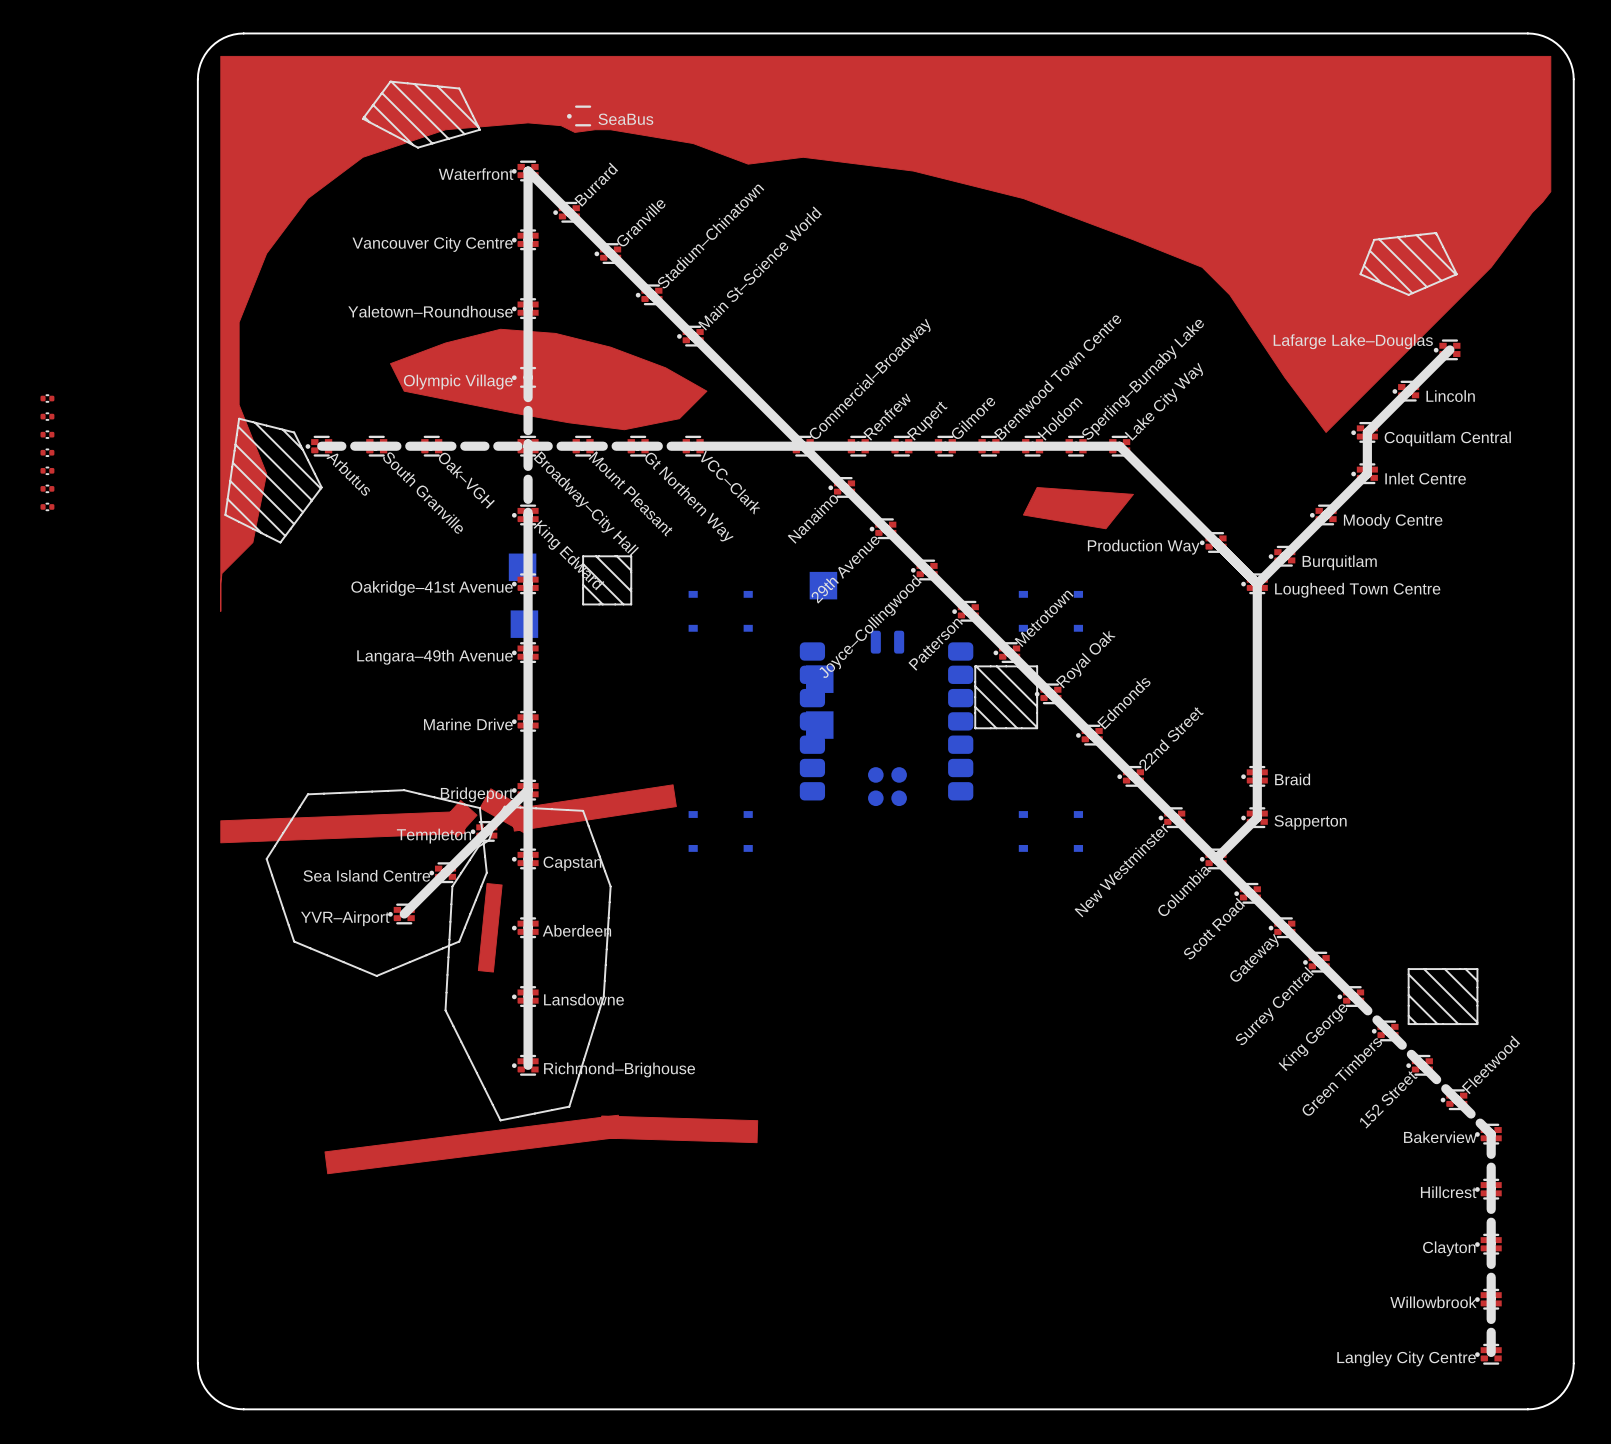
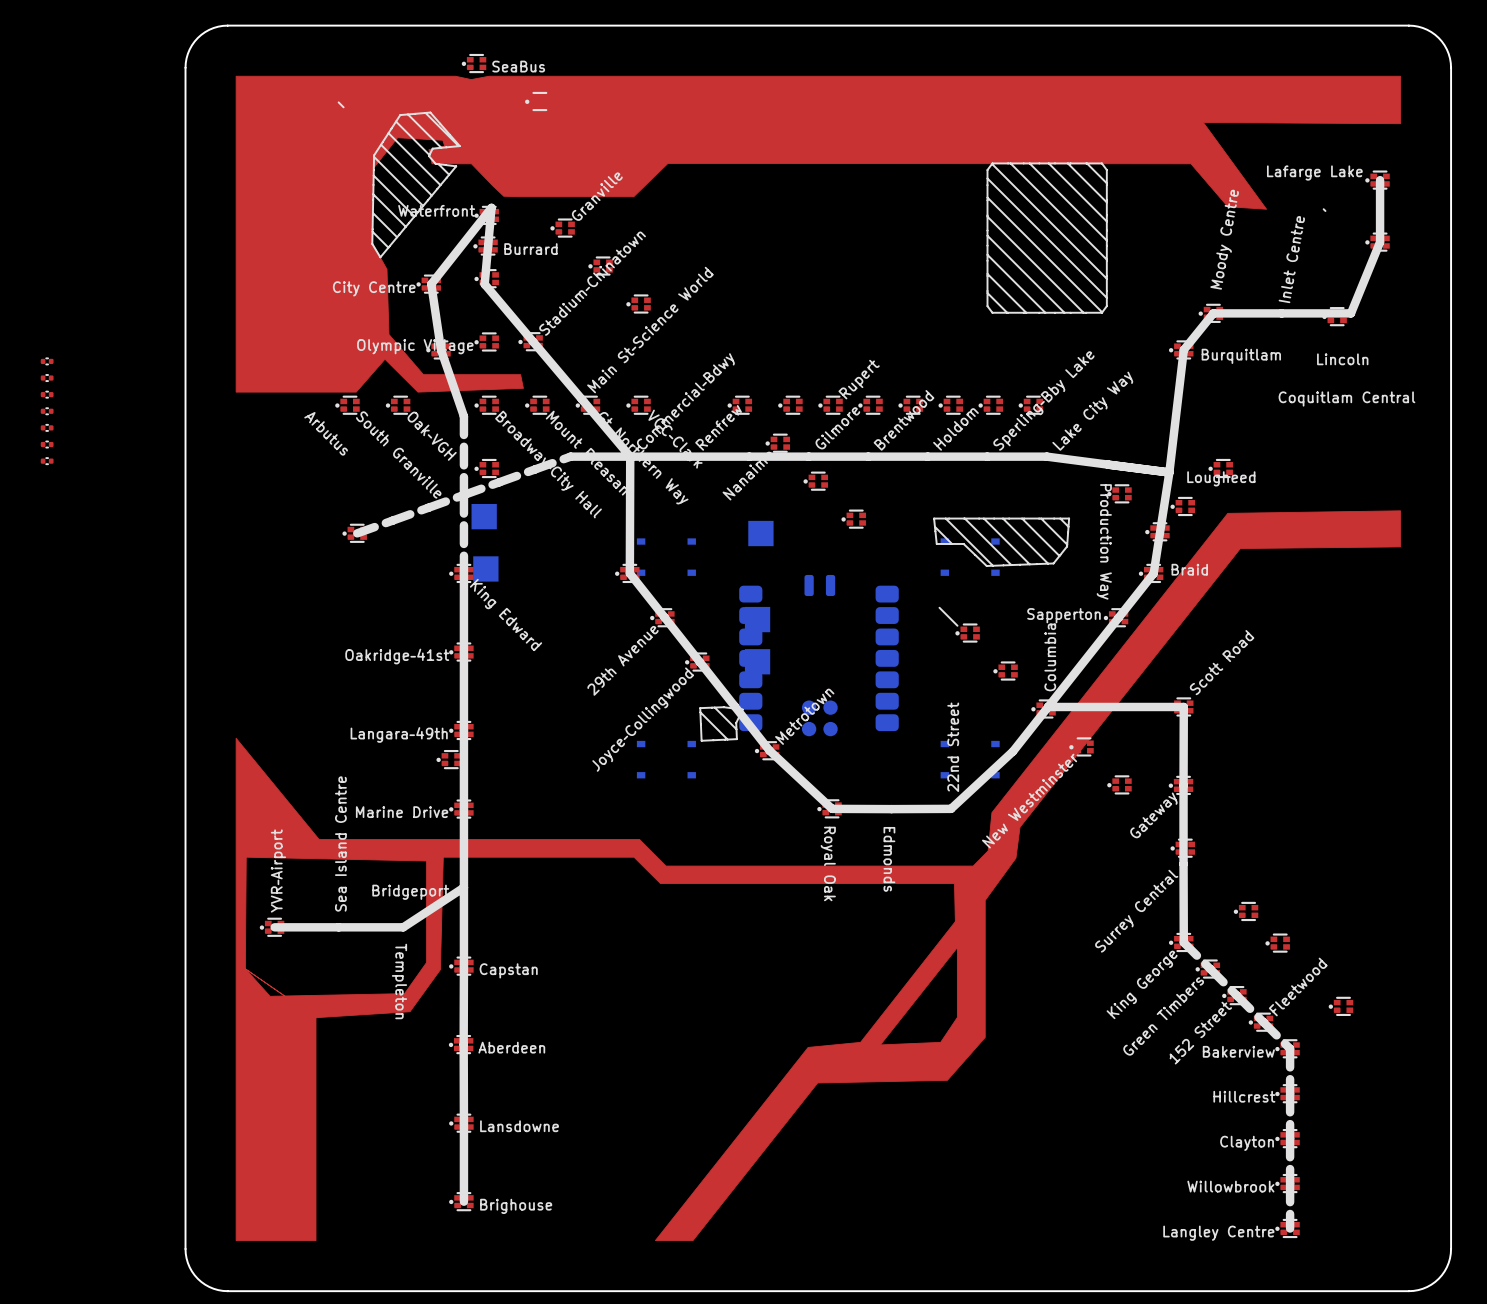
drawing: [220, 55, 1552, 612] -> none
part: none -> (474, 63)
line: (390, 81) (459, 88) (479, 129) (418, 147) (362, 118) (390, 81) -> none
line: (391, 81) (448, 138) -> none
line: (414, 84) (464, 134) -> none
line: (437, 86) (478, 127) -> none
drawing: none -> [235, 75, 1401, 393]
line: (382, 93) (426, 137) -> none
line: (373, 104) (413, 145) -> none
text position: SeaBus (625, 119) -> SeaBus (518, 66)
line: none -> (430, 112) (459, 146) (432, 148) (429, 156) (435, 163) (456, 166) (380, 257) (372, 243) (374, 155) (400, 115) (430, 112)
line: none -> (425, 112) (458, 146)
line: none -> (407, 114) (441, 147)
line: none -> (401, 126) (429, 155)
line: none -> (388, 133) (440, 185)
line: none -> (381, 144) (431, 195)
part: (525, 171) -> none
text position: Waterfront (476, 174) -> Waterfront (436, 210)
line: none -> (374, 156) (423, 206)
line: none -> (992, 163) (1106, 278)
line: none -> (992, 163) (1101, 163) (1106, 170) (1106, 306) (1101, 312) (992, 312) (987, 306) (987, 170) (992, 163)
line: none -> (1010, 163) (1106, 259)
line: none -> (1029, 163) (1106, 240)
line: none -> (1048, 163) (1106, 221)
line: none -> (1086, 163) (1106, 183)
line: none -> (438, 164) (449, 174)
text rotation: 0° (596, 184) -> 45° clockwise (530, 249)
text position: Burrard (596, 184) -> Burrard (530, 249)
text: none -> Lafarge Lake (1314, 173)
line: none -> (373, 175) (414, 216)
line: none -> (987, 178) (1106, 297)
part: none -> (1377, 180)
line: none -> (1380, 180) (1380, 242) (1350, 313) (1213, 313) (1183, 349) (1169, 472)
part: (566, 212) -> none
line: none -> (373, 194) (405, 226)
line: none -> (987, 197) (1102, 312)
line: (1436, 232) (1374, 239) (1360, 274) (1408, 294) (1456, 274) (1436, 232) -> none
line: (1416, 235) (1455, 274) -> none
text position: Stadium–Chinatown (711, 236) -> Stadium–Chinatown (592, 283)
line: none -> (372, 213) (397, 237)
line: (1397, 237) (1441, 280) -> none
line: (1379, 239) (1426, 287) -> none
line: none -> (987, 216) (1083, 312)
text: Vancouver City Centre (432, 244) -> none
line: (1369, 250) (1412, 293) -> (1067, 163) (1106, 202)
line: none -> (372, 231) (388, 247)
line: none -> (987, 235) (1064, 312)
line: (1363, 265) (1381, 283) -> none
text position: Main St–Science World (760, 268) -> Main St–Science World (650, 330)
part: none -> (1377, 242)
part: none -> (485, 246)
line: none -> (987, 254) (1045, 312)
line: none -> (987, 273) (1026, 312)
text: Yaletown–Roundhouse (430, 311) -> none
part: none -> (428, 284)
text: none -> City Centre (374, 288)
line: none -> (987, 293) (1007, 312)
text: Lafarge Lake–Douglas (1353, 341) -> none
part: none -> (1210, 313)
line: (1449, 349) (1367, 432) (1367, 473) (1257, 583) -> none
part: none -> (530, 341)
text: Brentwood Town Centre (1057, 377) -> none
text: Commercial–Broadway (870, 378) -> Commercial–Bdwy (685, 401)
text: Sperling–Burnaby Lake (1143, 379) -> Sperling–Bby Lake (1043, 400)
part: none -> (438, 349)
part: none -> (1181, 349)
part: (1405, 391) -> none
line: (528, 397) (528, 171) (1367, 1010) -> none
text position: Lake City Way (1163, 401) -> Lake City Way (1092, 411)
line: (528, 410) (528, 430) -> (463, 525) (463, 543)
text position: Renfrew (886, 417) -> Renfrew (718, 427)
text position: Gilmore (973, 417) -> Gilmore (837, 428)
line: (239, 418) (294, 432) (321, 487) (280, 542) (225, 515) (239, 418) -> none
text position: Holdom (1060, 419) -> Holdom (955, 429)
line: (254, 422) (320, 488) -> none
line: (238, 426) (311, 500) -> none
line: (282, 429) (302, 449) -> none
part: (1364, 432) -> none
line: (528, 443) (528, 466) -> none
line: (235, 444) (303, 512) -> none
part: (318, 446) -> none
line: (321, 446) (341, 446) -> none
line: (354, 446) (374, 446) -> none
line: (376, 446) (396, 446) -> none
line: (409, 446) (429, 446) -> none
line: (431, 446) (451, 446) -> none
line: (464, 446) (484, 446) -> none
line: (497, 446) (517, 446) -> none
line: (528, 446) (548, 446) -> none
line: (561, 446) (581, 446) -> none
line: (583, 446) (603, 446) -> none
line: (616, 446) (636, 446) -> none
line: (638, 446) (658, 446) -> none
line: (671, 446) (691, 446) -> none
line: (693, 446) (1119, 446) (1257, 583) -> none
line: (232, 462) (294, 524) -> none
text: none -> Brentwood (904, 420)
part: (1364, 473) -> none
line: none -> (463, 434) (463, 416) (441, 349) (431, 284) (491, 207) (484, 284) (630, 456) (629, 573) (769, 750) (832, 808) (951, 808) (1013, 751) (1048, 706)
text rotation: 0° (1425, 478) -> 80° counterclockwise (1291, 259)
text position: Inlet Centre (1425, 478) -> Inlet Centre (1291, 259)
line: (528, 479) (528, 499) -> (463, 446) (463, 465)
line: (230, 480) (285, 536) -> none
line: (227, 499) (261, 533) -> none
line: none -> (563, 459) (570, 456) (1046, 456) (1169, 472)
line: none -> (552, 463) (528, 471)
line: (528, 512) (528, 1065) -> none
line: none -> (1169, 472) (1153, 573) (1048, 706)
text rotation: 0° (1393, 521) -> 80° counterclockwise (1224, 239)
text position: Moody Centre (1393, 521) -> Moody Centre (1224, 239)
line: none -> (516, 475) (492, 484)
line: none -> (463, 477) (463, 513)
text: none -> Lougheed (1221, 478)
line: none -> (481, 488) (456, 497)
text rotation: 0° (1143, 547) -> 90° clockwise (1104, 541)
line: none -> (445, 501) (421, 510)
text position: King Edward (568, 555) -> King Edward (505, 614)
line: (583, 556) (631, 556) (631, 604) (583, 604) (583, 556) -> none
line: (596, 556) (631, 591) -> none
line: (616, 556) (631, 570) -> none
drawing: none -> [235, 510, 1401, 1241]
text position: Burquitlam (1339, 562) -> Burquitlam (1241, 356)
line: (583, 563) (623, 604) -> none
line: none -> (410, 514) (385, 523)
text position: 29th Avenue (845, 569) -> 29th Avenue (623, 660)
line: none -> (934, 518) (1069, 518) (1067, 546) (1053, 563) (986, 566) (963, 543) (936, 543) (934, 518)
line: none -> (945, 518) (992, 565)
line: none -> (964, 518) (1011, 565)
line: none -> (983, 518) (1029, 564)
line: none -> (1003, 518) (1048, 563)
line: none -> (1022, 518) (1059, 555)
line: none -> (1041, 518) (1067, 544)
line: none -> (1060, 518) (1068, 526)
line: none -> (374, 527) (357, 533)
line: none -> (934, 526) (952, 543)
part: (525, 583) -> none
line: (1257, 583) (1257, 817) (1216, 858) -> none
line: (583, 584) (602, 604) -> none
part: none -> (354, 533)
text: Oakridge–41st Avenue (432, 588) -> none
text: Lougheed Town Centre (1357, 590) -> none
line: none -> (463, 555) (463, 1201)
part: (965, 611) -> none
text: Metrotown (1044, 618) -> none
text: Joyce–Collingwood (870, 626) -> none
part: none -> (461, 573)
part: none -> (627, 573)
part: none -> (1151, 573)
text: Patterson (935, 644) -> none
part: (525, 652) -> none
part: (1006, 652) -> none
text: Langara–49th Avenue (434, 657) -> none
text: Royal Oak (1085, 659) -> none
line: (975, 666) (1037, 666) (1037, 728) (975, 728) (975, 666) -> none
line: (976, 666) (1037, 727) -> none
line: (996, 666) (1037, 706) -> none
part: none -> (662, 617)
part: none -> (1116, 617)
line: (975, 686) (1017, 728) -> none
text rotation: 0° (1123, 703) -> 135° clockwise (889, 859)
text position: Edmonds (1123, 703) -> Edmonds (889, 859)
line: (975, 707) (996, 728) -> none
text: none -> Oakridge–41st (397, 656)
part position: (525, 721) -> (461, 652)
text position: Marine Drive (468, 724) -> Marine Drive (402, 812)
part: none -> (697, 662)
text rotation: 0° (1171, 739) -> 45° counterclockwise (953, 747)
text position: 22nd Street (1171, 739) -> 22nd Street (953, 747)
line: none -> (714, 707) (736, 729)
line: none -> (723, 707) (742, 709) (736, 722) (736, 739) (701, 740) (700, 708) (723, 707)
line: none -> (1048, 706) (1183, 706) (1183, 942) (1196, 955)
part: none -> (1181, 706)
part: (1254, 776) -> none
text position: Braid (1292, 779) -> Braid (1189, 569)
line: none -> (700, 712) (727, 739)
text: none -> Joyce–Collingwood (643, 719)
drawing: [220, 784, 677, 844] -> none
text: none -> Metrotown (804, 716)
line: (404, 790) (307, 794) (266, 858) (294, 941) (376, 975) (459, 941) (486, 872) (479, 808) (404, 790) -> none
part position: (525, 790) -> (461, 730)
line: (528, 790) (404, 914) -> none
text position: Bridgeport (477, 794) -> Bridgeport (410, 892)
text: none -> Langara–49th (399, 734)
line: (504, 806) (583, 810) (610, 886) (603, 996) (569, 1106) (500, 1120) (445, 1010) (452, 886) (478, 846) (489, 840) (495, 820) (504, 806) -> none
part: (1254, 817) -> none
part: none -> (767, 750)
text position: Sapperton (1310, 822) -> Sapperton (1063, 615)
text rotation: 0° (433, 836) -> 90° clockwise (399, 981)
text position: Templeton (433, 836) -> Templeton (399, 981)
part: (525, 858) -> none
part: none -> (1180, 785)
text position: Capstan (572, 863) -> Capstan (508, 970)
part: (442, 872) -> none
text rotation: 0° (366, 875) -> 90° counterclockwise (340, 844)
drawing: [477, 883, 503, 973] -> none
part: none -> (829, 808)
part: none -> (461, 809)
text rotation: 0° (1184, 891) -> 45° counterclockwise (1050, 657)
text position: Columbia (1184, 891) -> Columbia (1050, 657)
part: (1247, 893) -> none
part: (401, 913) -> none
text rotation: 0° (345, 918) -> 90° counterclockwise (278, 871)
part: (525, 927) -> none
text position: Scott Road (1214, 929) -> Scott Road (1222, 662)
text position: Aberdeen (576, 930) -> Aberdeen (511, 1047)
text: none -> Royal Oak (828, 863)
text position: Gateway (1254, 957) -> Gateway (1153, 815)
part: (1316, 962) -> none
line: (1408, 969) (1477, 969) (1477, 1024) (1408, 1024) (1408, 969) -> none
line: (1424, 969) (1477, 1022) -> none
line: (1444, 969) (1477, 1001) -> none
line: (1465, 969) (1477, 980) -> none
line: none -> (463, 887) (403, 927) (274, 927)
line: (1408, 974) (1458, 1024) -> none
line: (1408, 995) (1437, 1024) -> none
part: (525, 996) -> none
text: Lansdowne (583, 999) -> none
text position: Surrey Central (1274, 1006) -> Surrey Central (1136, 911)
part: none -> (272, 927)
line: (1408, 1015) (1416, 1024) -> none
line: (1376, 1019) (1402, 1045) -> none
part: none -> (1181, 942)
text position: King George (1313, 1036) -> King George (1142, 984)
line: none -> (1205, 963) (1223, 982)
line: (1411, 1054) (1436, 1079) -> none
part: none -> (1207, 969)
text position: Fleetwood (1490, 1064) -> Fleetwood (1298, 987)
part position: (525, 1065) -> (461, 966)
part: (1419, 1065) -> none
text: Richmond–Brighouse (619, 1069) -> none
text position: Green Timbers (1342, 1077) -> Green Timbers (1163, 1016)
line: none -> (1231, 990) (1250, 1008)
part: none -> (1234, 995)
line: (1445, 1088) (1471, 1114) -> none
text position: 152 Street (1388, 1099) -> 152 Street (1200, 1033)
line: none -> (1258, 1017) (1276, 1035)
drawing: [324, 1114, 759, 1175] -> none
part: none -> (1260, 1022)
line: (1480, 1123) (1491, 1134) (1491, 1154) -> none
part: (1488, 1134) -> none
text position: Bakerview (1440, 1137) -> Bakerview (1238, 1051)
line: none -> (1285, 1043) (1290, 1048) (1290, 1067)
part: none -> (461, 1044)
part: none -> (1287, 1048)
line: (1491, 1167) (1491, 1187) -> none
line: none -> (1290, 1079) (1290, 1112)
part: (1488, 1189) -> none
line: (1491, 1189) (1491, 1209) -> none
text position: Hillcrest (1448, 1192) -> Hillcrest (1244, 1096)
part: none -> (1287, 1093)
line: (1491, 1222) (1491, 1242) -> none
part: none -> (461, 1123)
line: none -> (1290, 1124) (1290, 1157)
text: none -> Lansdowne (519, 1126)
part: none -> (1287, 1138)
part: (1488, 1244) -> none
line: (1491, 1244) (1491, 1264) -> none
text position: Clayton (1449, 1248) -> Clayton (1247, 1143)
line: none -> (1290, 1169) (1290, 1202)
line: (1491, 1277) (1491, 1297) -> none
part: none -> (1287, 1183)
part: (1488, 1299) -> none
line: (1491, 1299) (1491, 1319) -> none
text position: Willowbrook (1433, 1302) -> Willowbrook (1230, 1186)
part: none -> (461, 1201)
text: none -> Brighouse (516, 1206)
line: none -> (1290, 1213) (1290, 1228)
line: (1491, 1332) (1491, 1352) -> none
part: none -> (1287, 1228)
part: (1488, 1354) -> none
text: Langley City Centre (1406, 1358) -> Langley Centre (1218, 1233)

